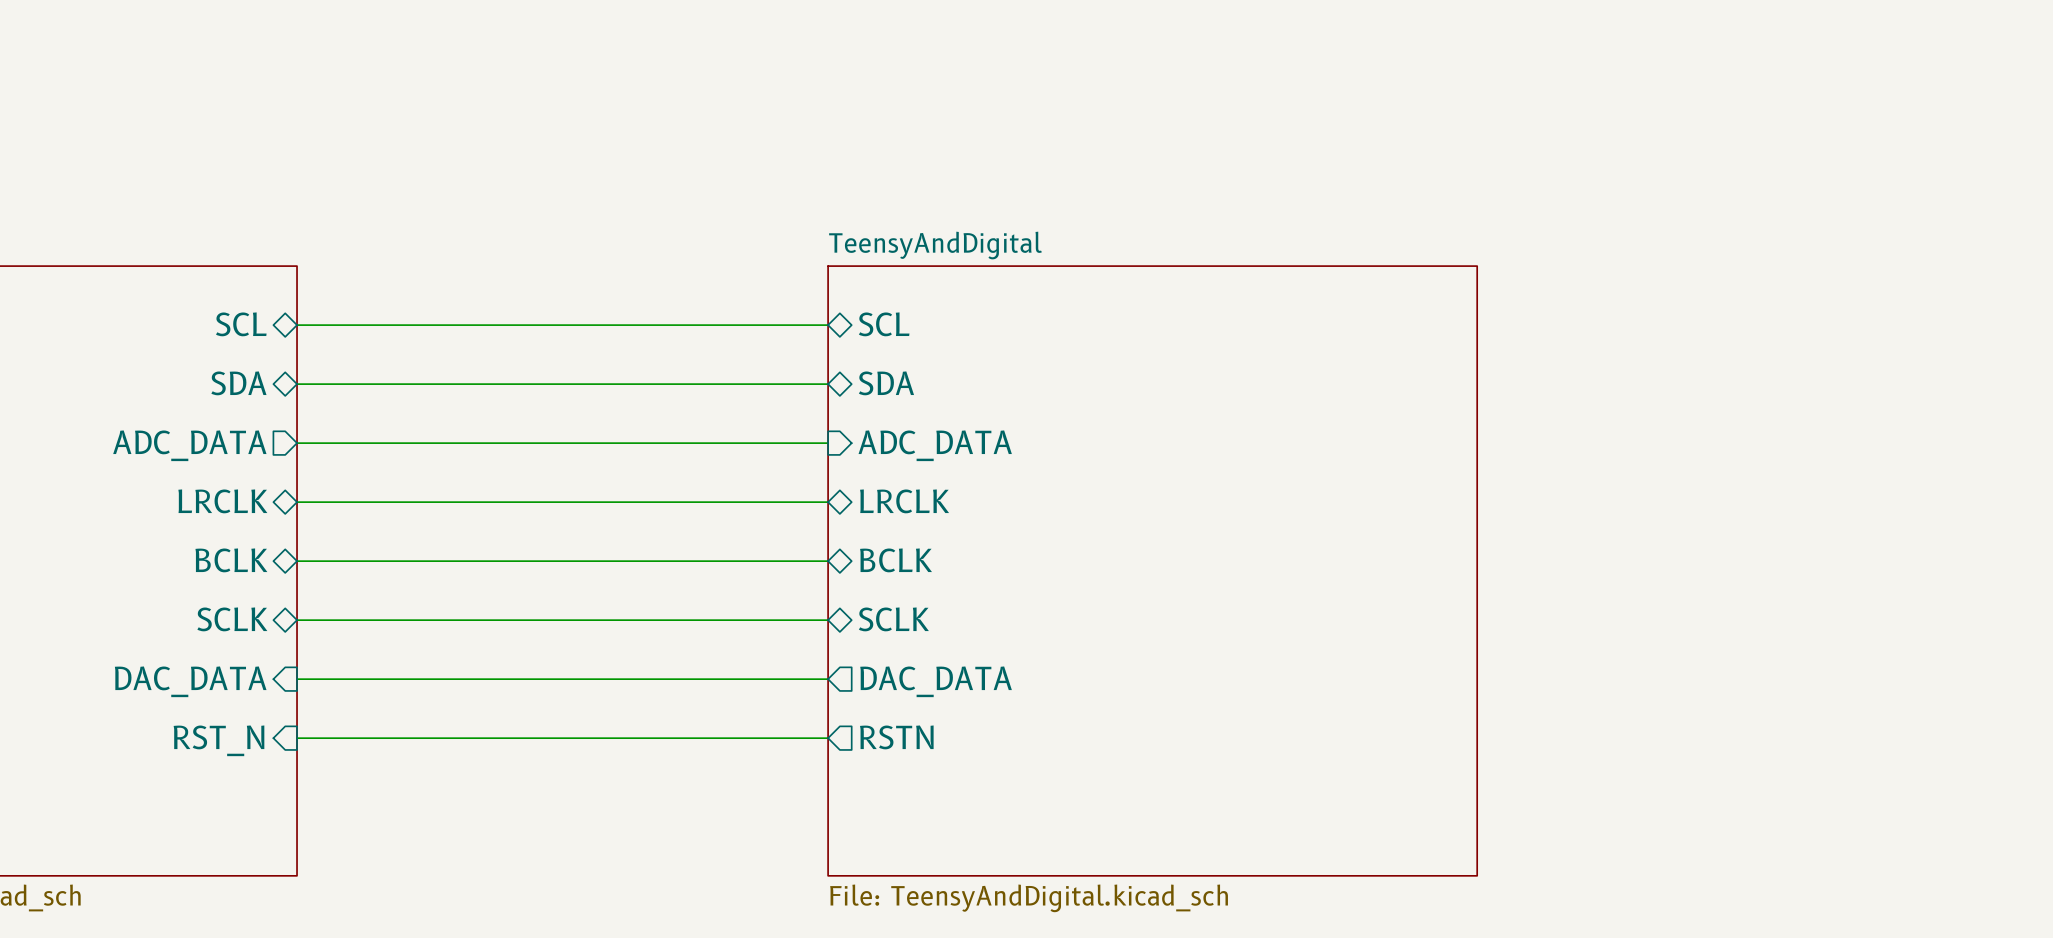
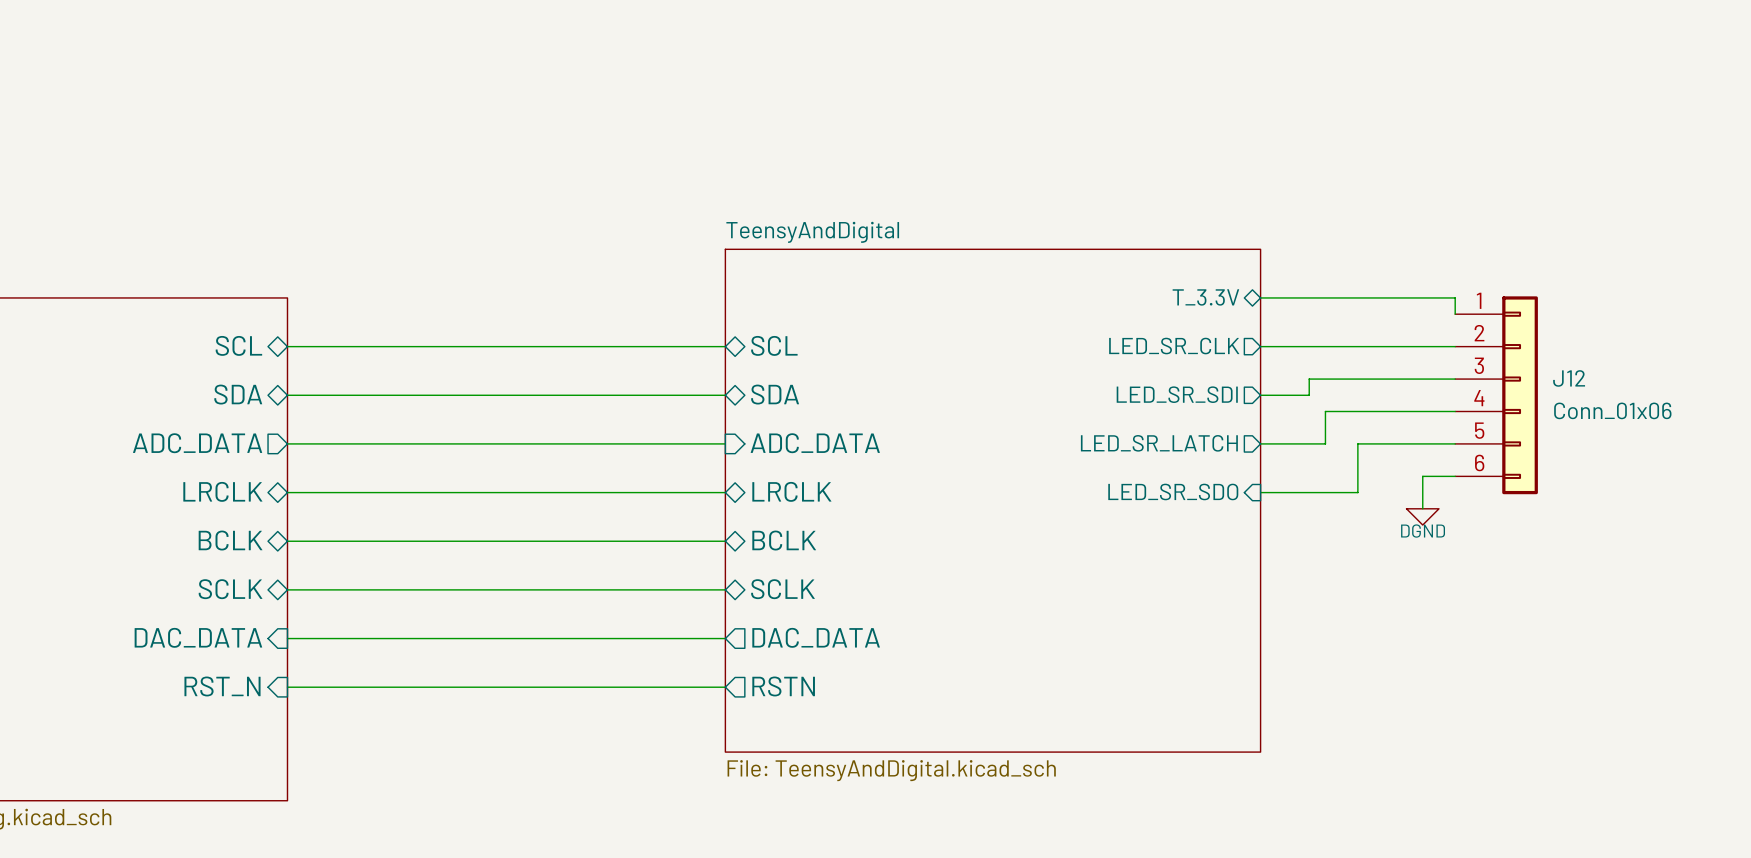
wire: none -> (1260, 297) (1455, 297) (1455, 314)
sheet pin: none -> T_3.3V (1205, 297)
wire: none -> (1260, 346) (1455, 346)
sheet pin: none -> LED_SR_CLK (1174, 346)
wire: none -> (1455, 379) (1309, 379) (1309, 395) (1260, 395)
J12: none -> Conn_01x06 (1496, 395)
sheet pin: none -> LED_SR_SDI (1177, 394)
wire: none -> (1455, 411) (1325, 411) (1325, 443) (1260, 443)
wire: none -> (1455, 443) (1357, 443) (1357, 492) (1260, 492)
sheet pin: none -> LED_SR_LATCH (1159, 443)
wire: none -> (1455, 476) (1422, 476) (1422, 508)
sheet pin: none -> LED_SR_SDO (1173, 491)
power symbol: none -> DGND (1422, 516)
sheet TeensyAndDigital position: (1152, 570) -> (992, 500)

